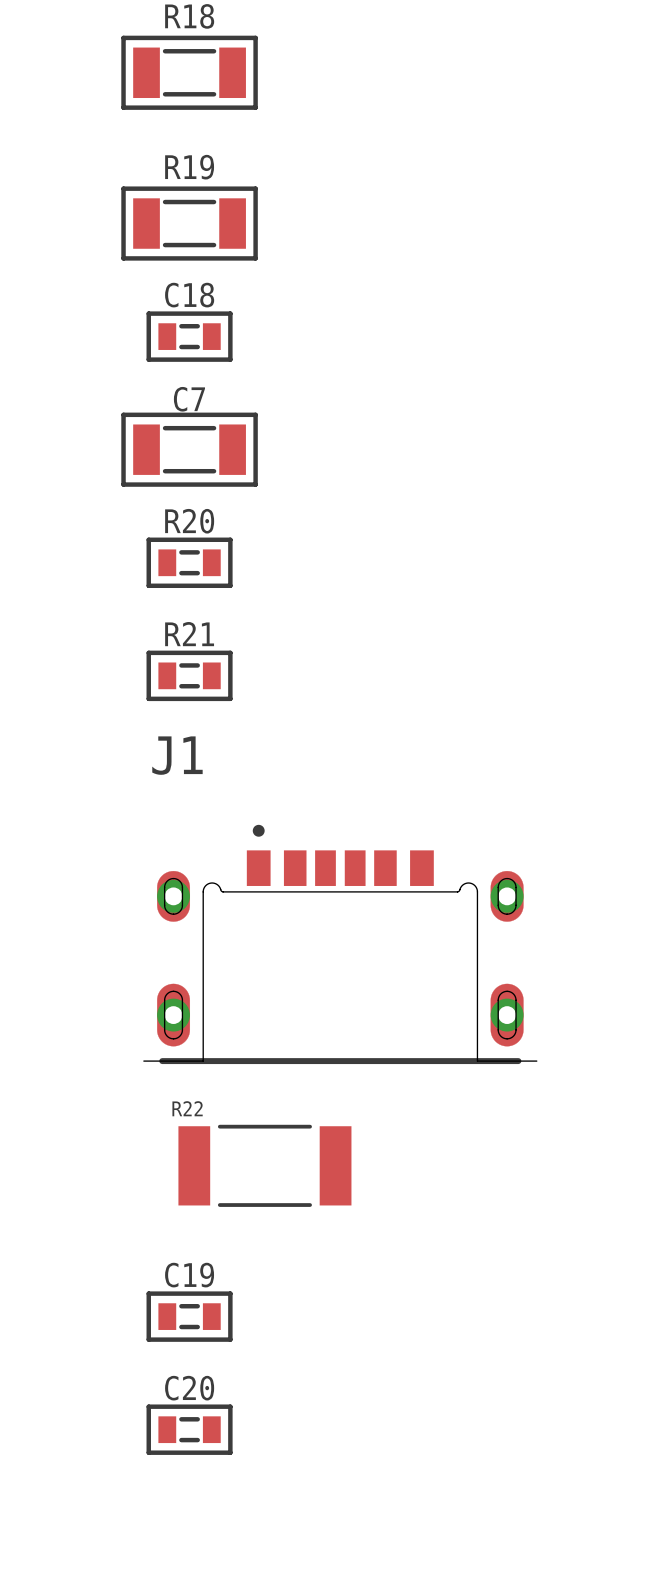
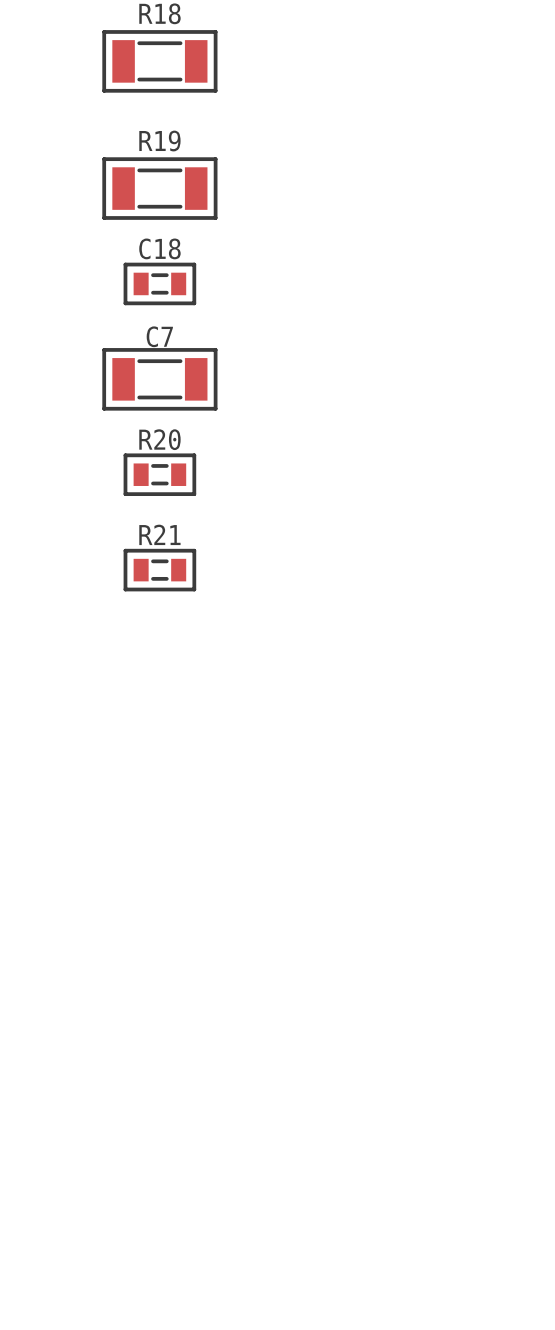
J1: (340, 944) -> none
R22: (264, 1165) -> none
C19: (189, 1316) -> none
C20: (189, 1429) -> none

